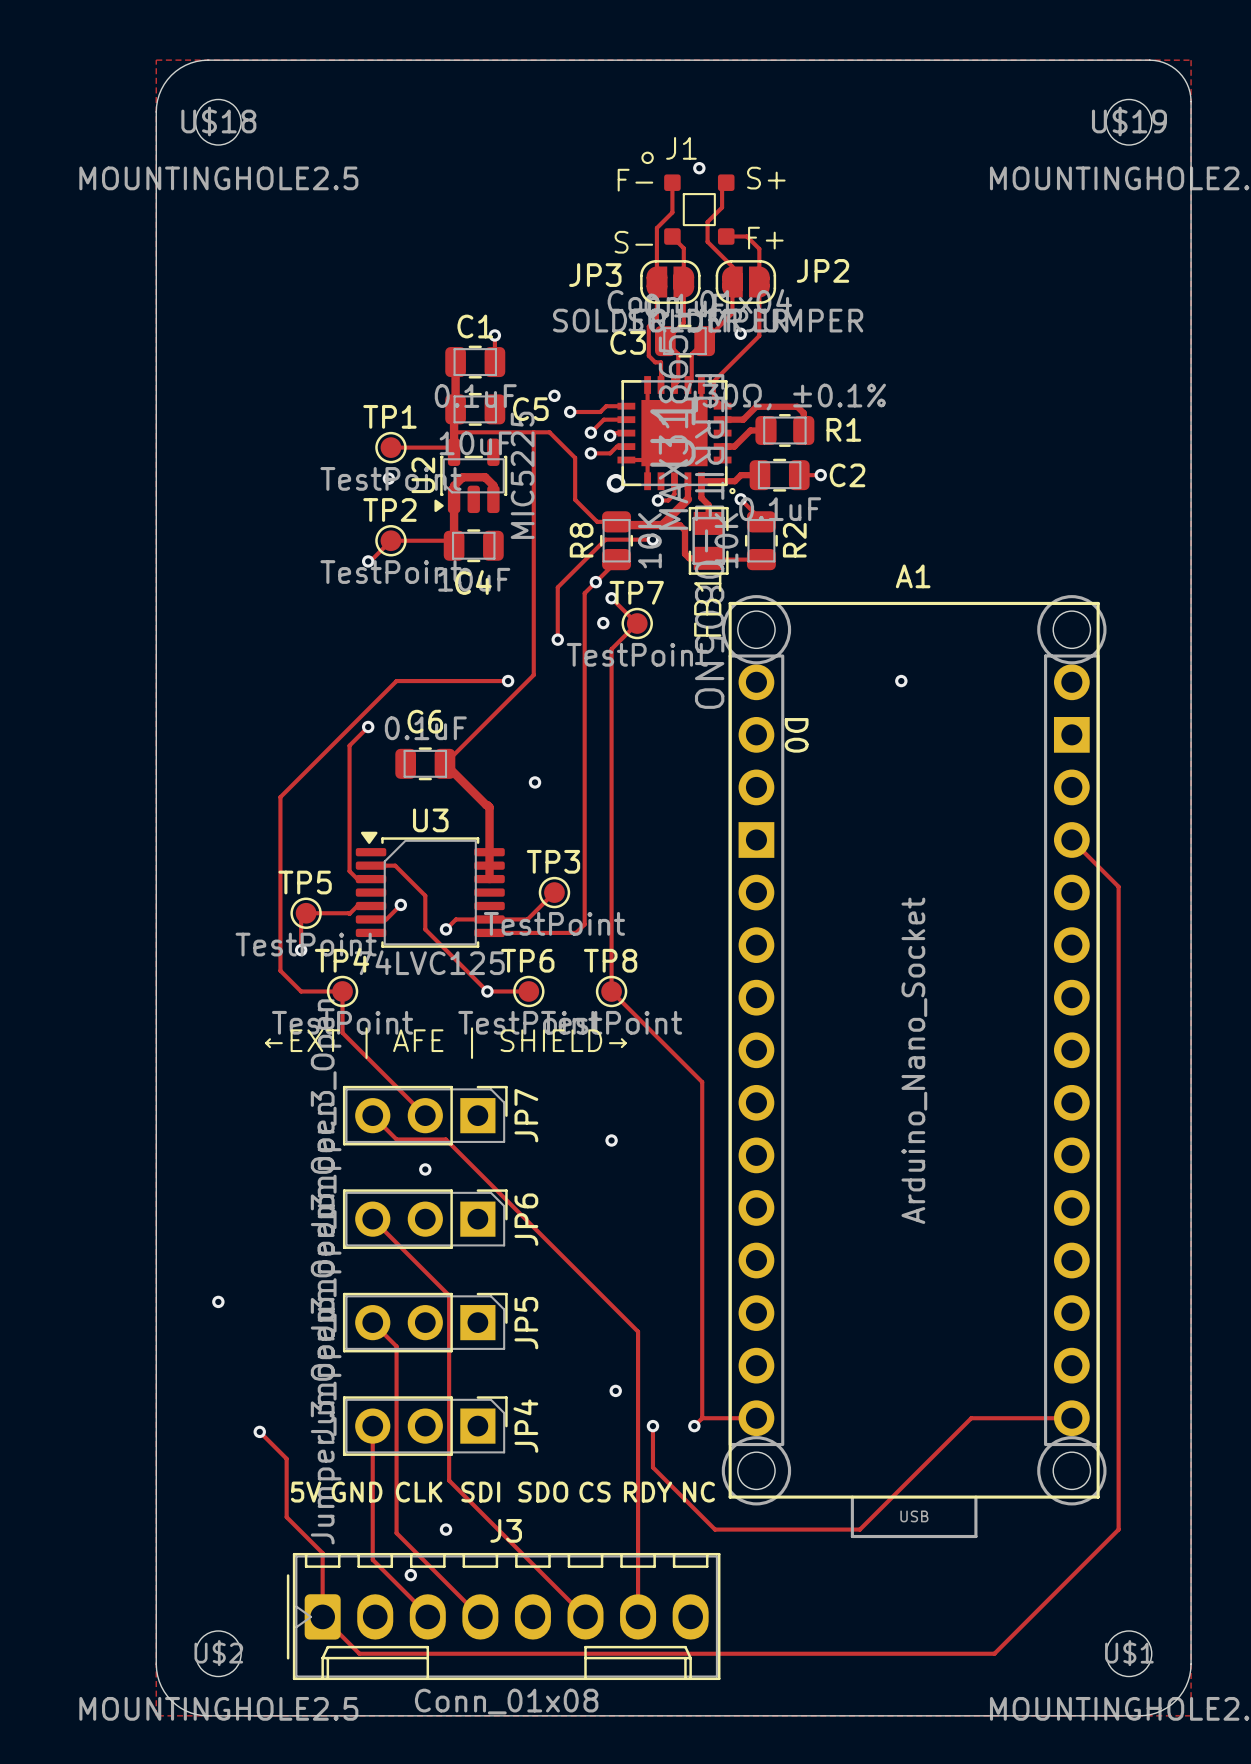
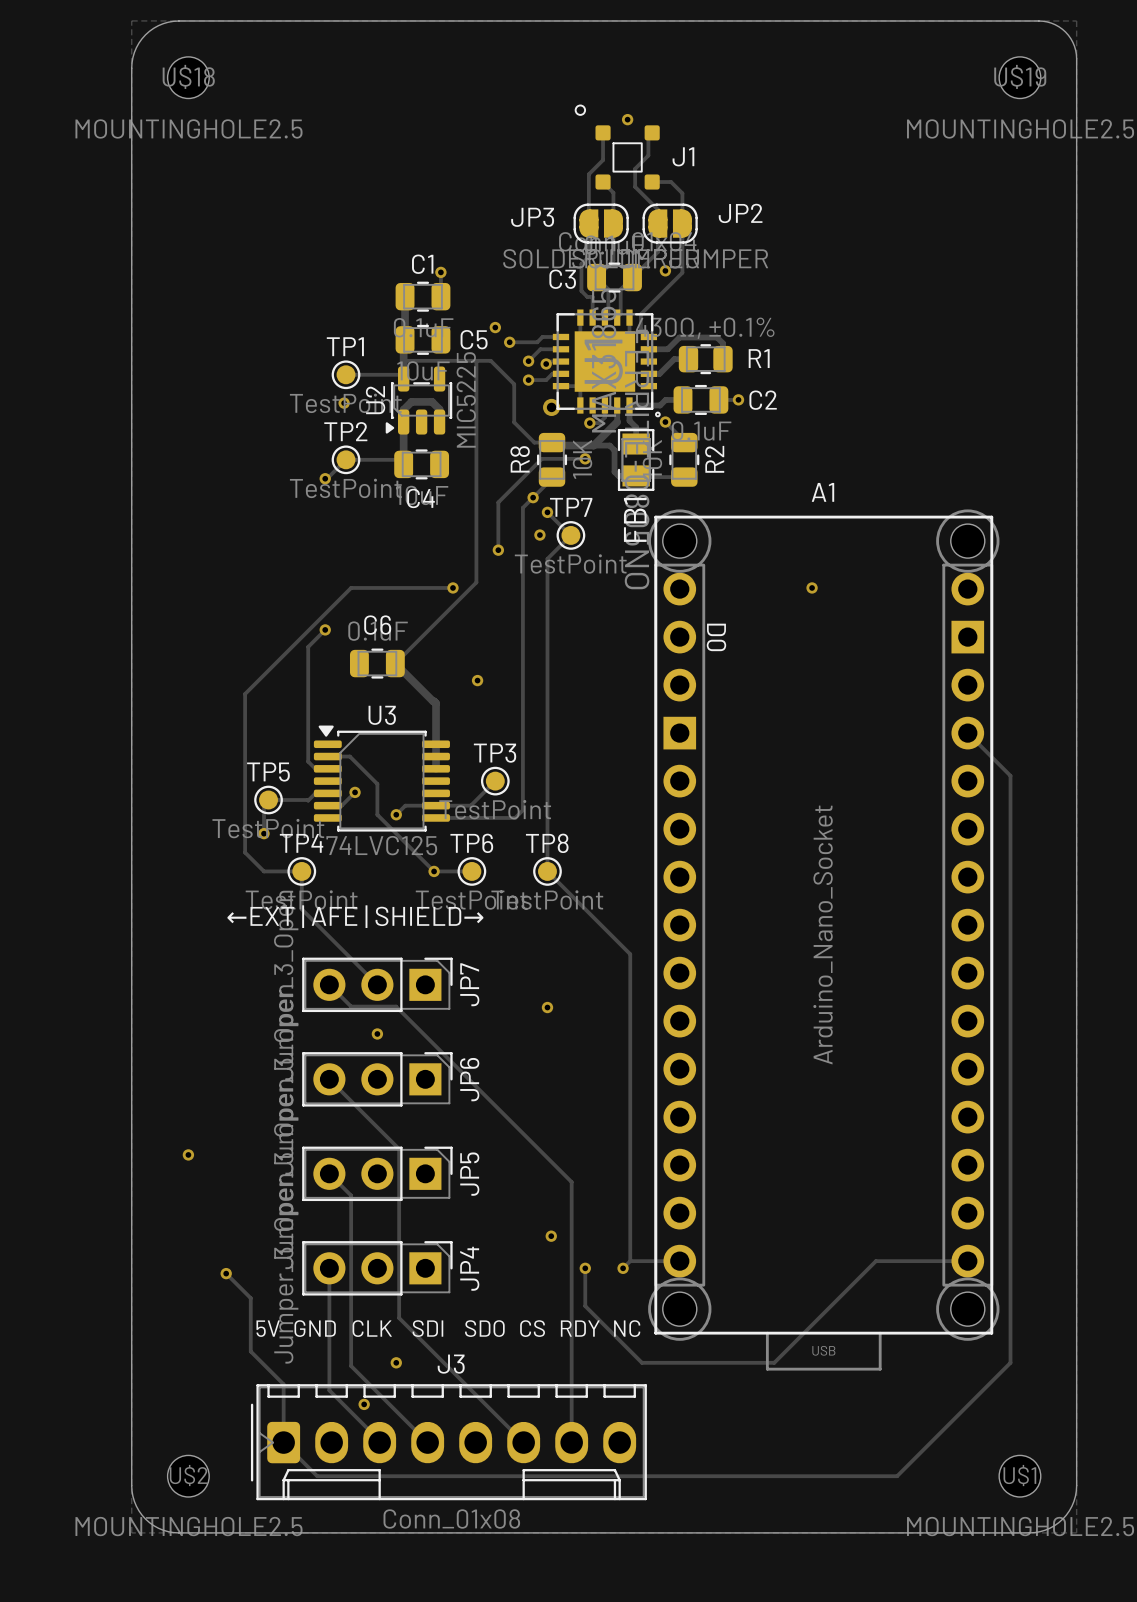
J1 name position: J1 (681, 148) -> J1 (683, 156)
J1 text: S+ (766, 178) -> none
J1 text: F- (635, 180) -> none
J1 text: F+ (765, 238) -> none
J1 text: S- (633, 242) -> none

